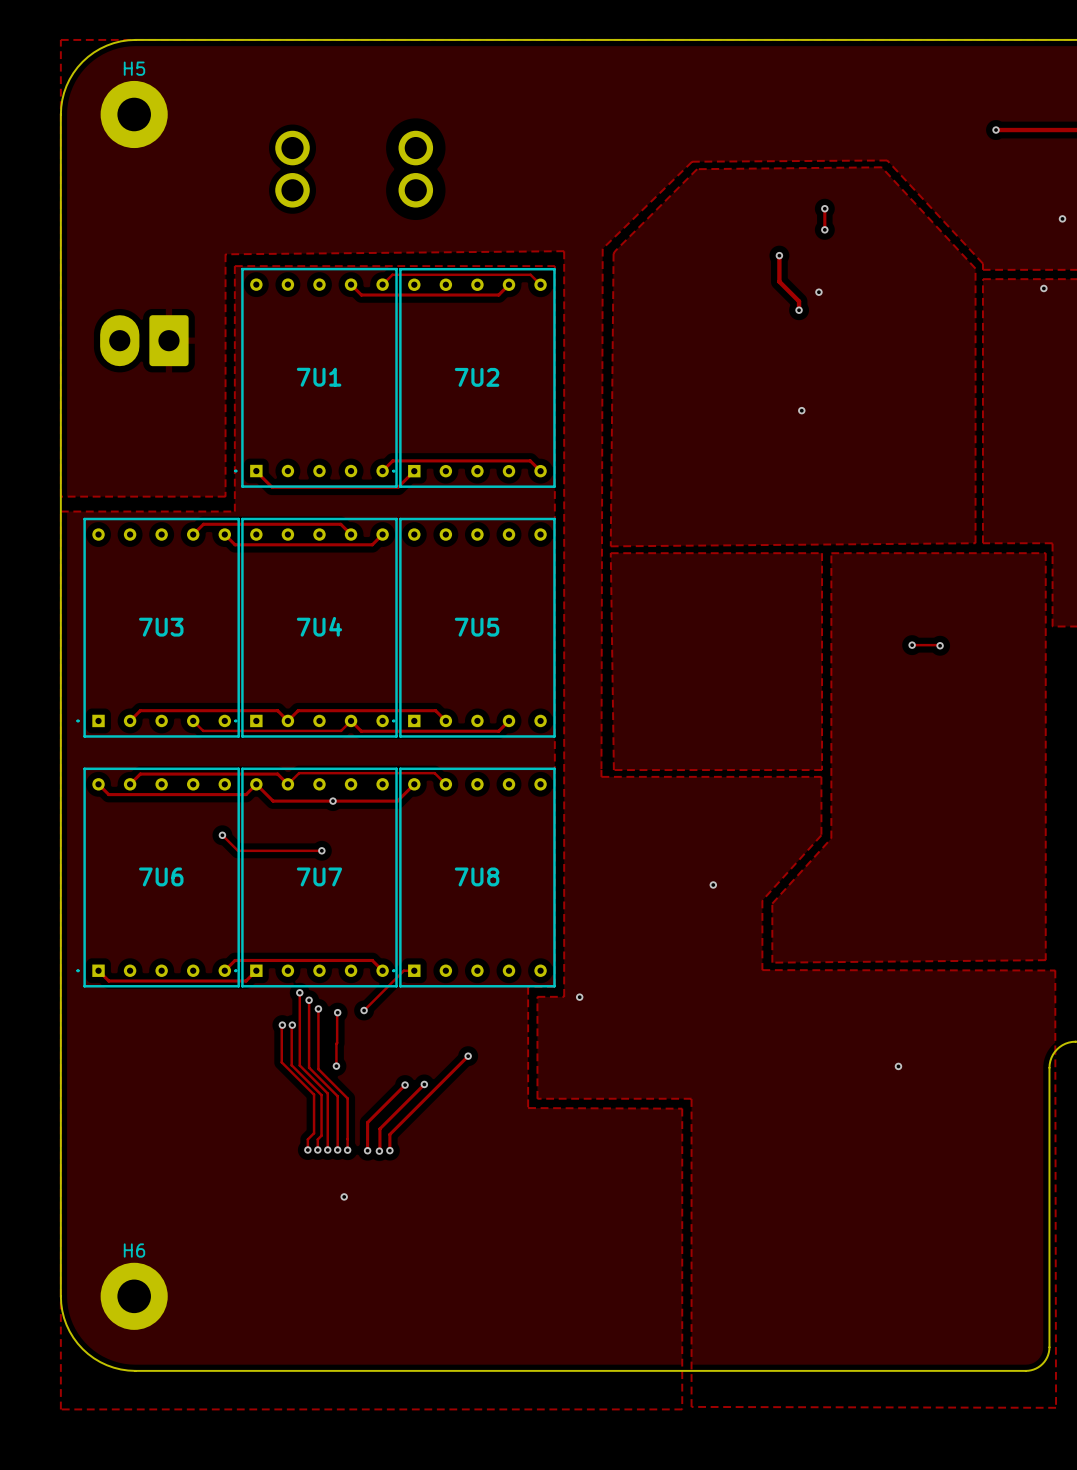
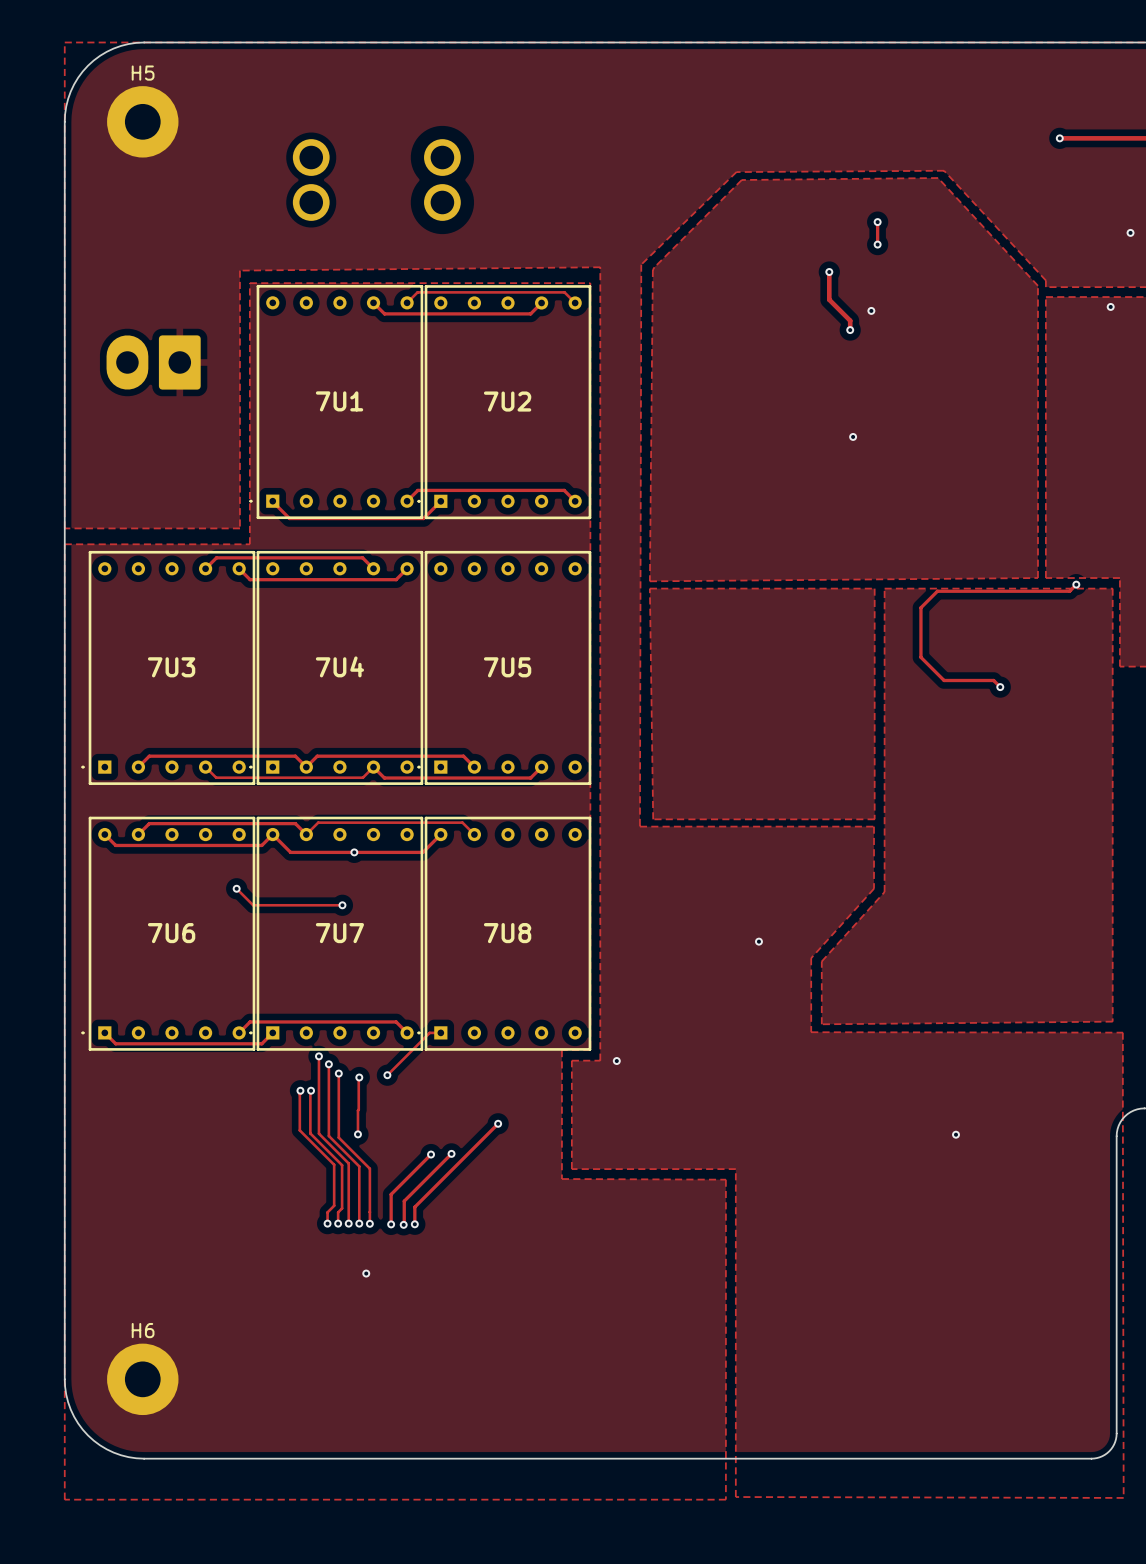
via: none -> (1076, 584)
track: (912, 645) (939, 645) -> (1076, 584) (1069, 591) (937, 591) (920, 607) (920, 657) (944, 680) (993, 680) (999, 686)
via: (912, 645) -> none

